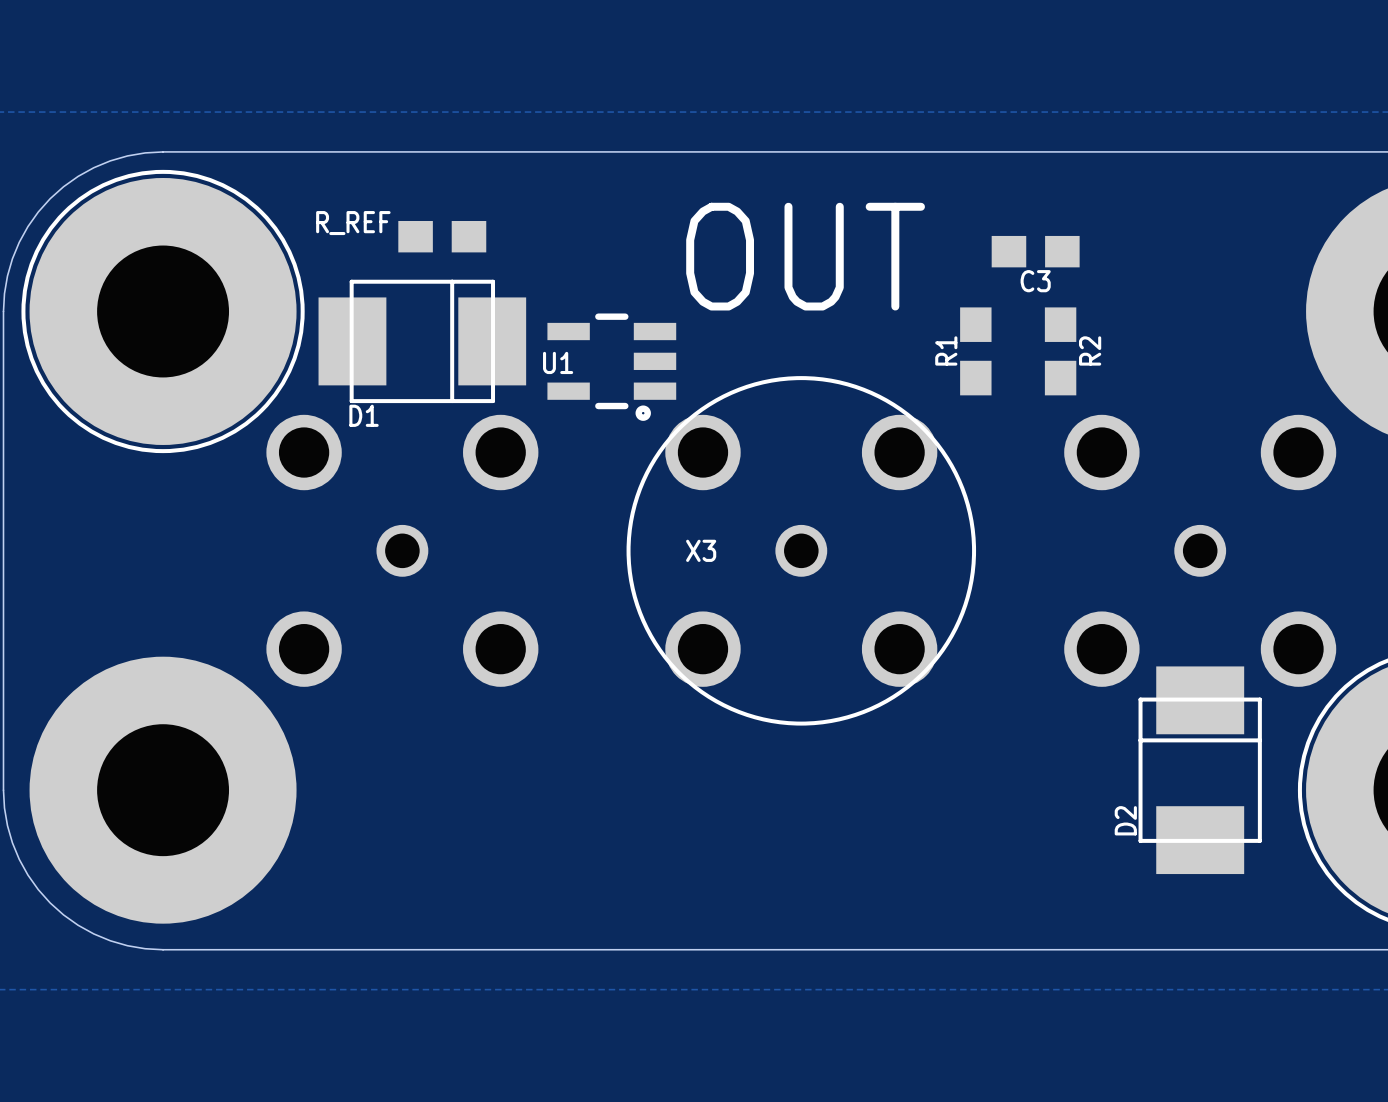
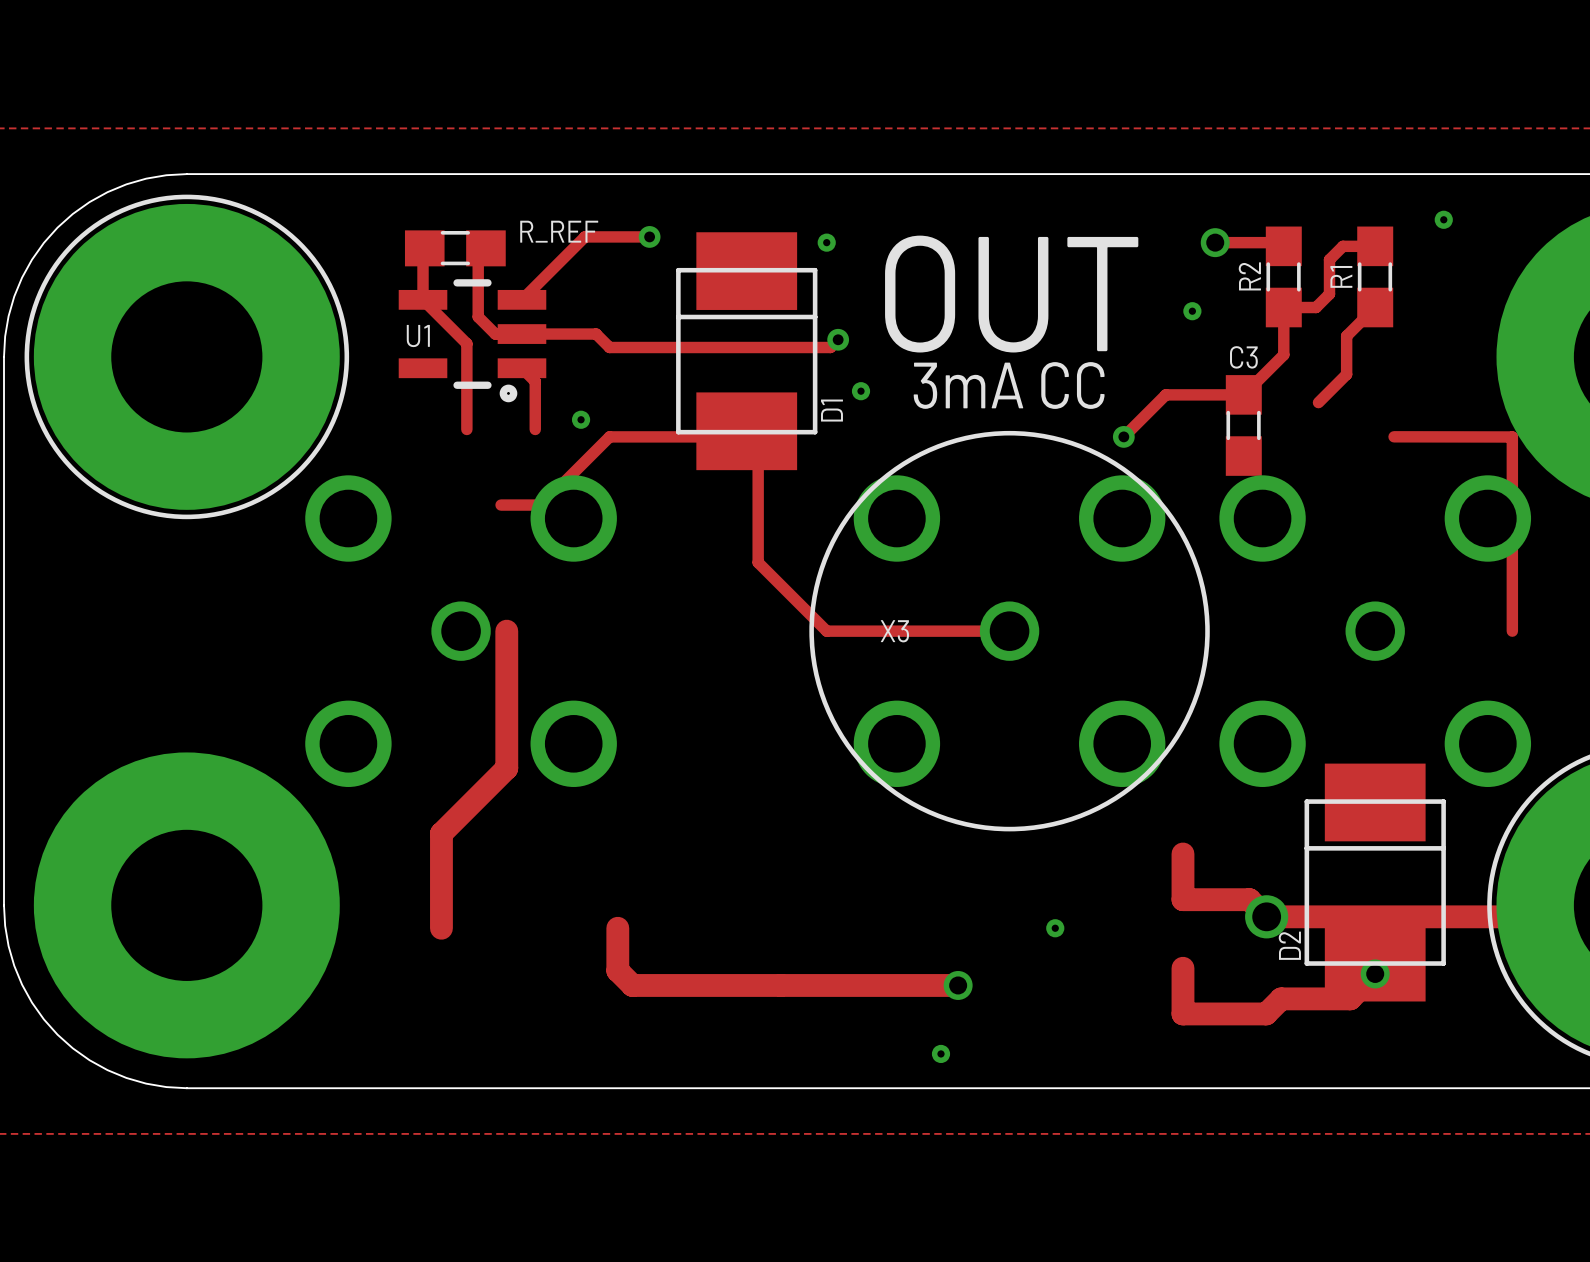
via: none -> (1443, 219)
track: none -> (649, 236) (584, 236) (521, 299)
via: none -> (649, 236)
via: none -> (826, 242)
track: none -> (1215, 242) (1280, 242) (1283, 246)
via: none -> (1215, 242)
track: none -> (1375, 246) (1342, 246) (1329, 259) (1329, 294) (1316, 307) (1283, 307) (1283, 354) (1243, 394) (1165, 394) (1123, 436)
track: none -> (424, 248) (423, 250) (423, 299) (466, 343) (466, 429)
R_REF: none -> (455, 248)
track: none -> (485, 248) (478, 256) (478, 316) (495, 334) (596, 334) (609, 347) (830, 347) (838, 339)
C3 footprint: [991, 235, 1080, 268] -> [1225, 375, 1262, 476]
R_REF: (442, 236) -> none
text position: OUT (805, 256) -> OUT (1011, 294)
track: none -> (1375, 307) (1346, 336) (1346, 374) (1318, 402)
via: none -> (1192, 311)
C3 name position: C3 (1035, 281) -> C3 (1243, 357)
via: none -> (838, 339)
R1 footprint: [960, 307, 992, 396] -> [1357, 226, 1394, 328]
R2 footprint: [1044, 307, 1077, 396] -> [1265, 226, 1302, 328]
track: none -> (521, 368) (535, 381) (535, 429)
text: none -> 3mA CC (1009, 385)
D1 rotation: 0° (422, 341) -> 90° counterclockwise (746, 351)
D1 position: (422, 341) -> (746, 351)
via: none -> (861, 391)
via: none -> (581, 419)
U1 position: (611, 367) -> (472, 340)
track: none -> (758, 436) (758, 562) (826, 631) (1009, 631)
track: none -> (758, 436) (609, 436) (541, 505) (501, 505)
via: none -> (1123, 436)
track: none -> (1394, 436) (1512, 436) (1512, 631)
track: none -> (506, 631) (506, 768) (441, 833) (441, 928)
X3 position: (801, 550) -> (1009, 631)
track: none -> (1182, 853) (1182, 899) (1249, 899) (1266, 916) (1529, 916)
via: none -> (1266, 916)
track: none -> (617, 928) (617, 970) (632, 985) (958, 985)
via: none -> (1055, 928)
track: none -> (1182, 968) (1182, 1013) (1266, 1013) (1281, 998) (1350, 998) (1375, 973)
via: none -> (1375, 973)
via: none -> (958, 985)
via: none -> (940, 1053)

